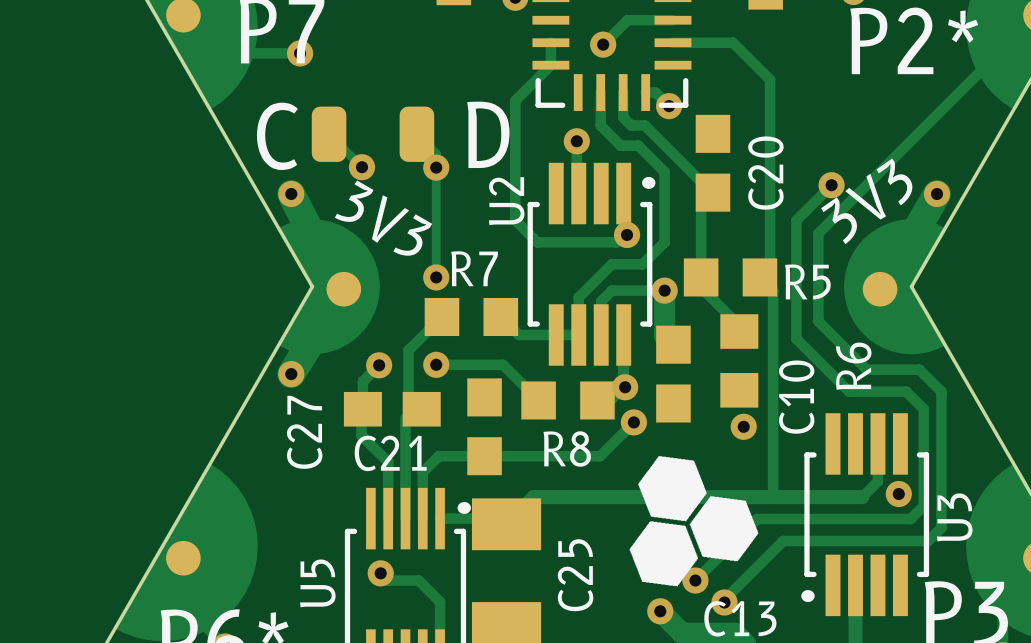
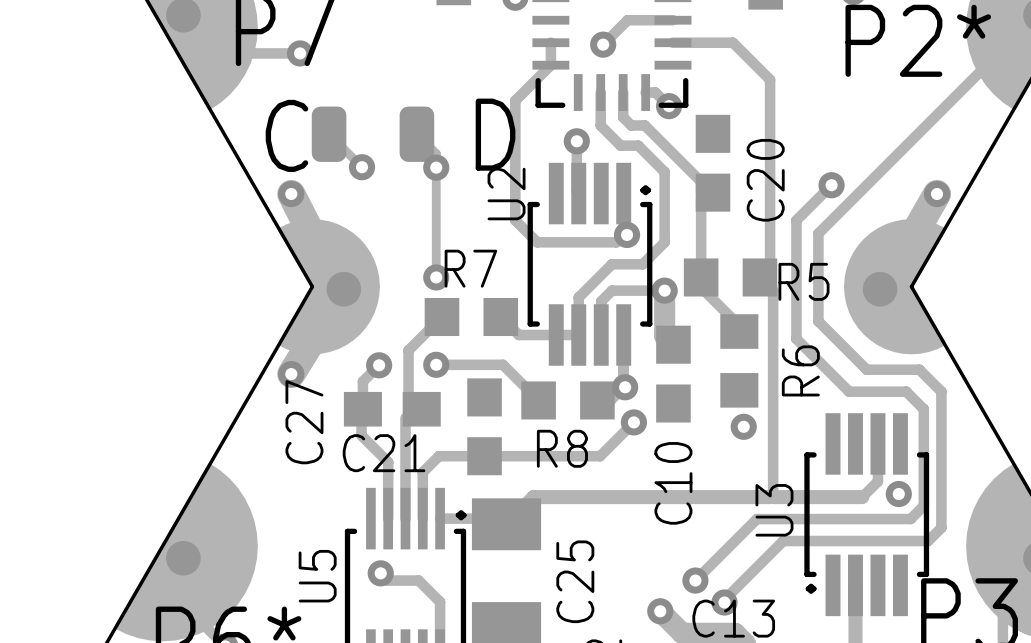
text: 3V3 (866, 201) -> none
text: 3V3 (383, 218) -> none
R6 name position: R6 (853, 366) -> R6 (800, 370)
C10 name position: C10 (796, 397) -> C10 (673, 483)
drawing: [629, 456, 759, 587] -> none
U3 name position: U3 (954, 517) -> U3 (774, 510)

